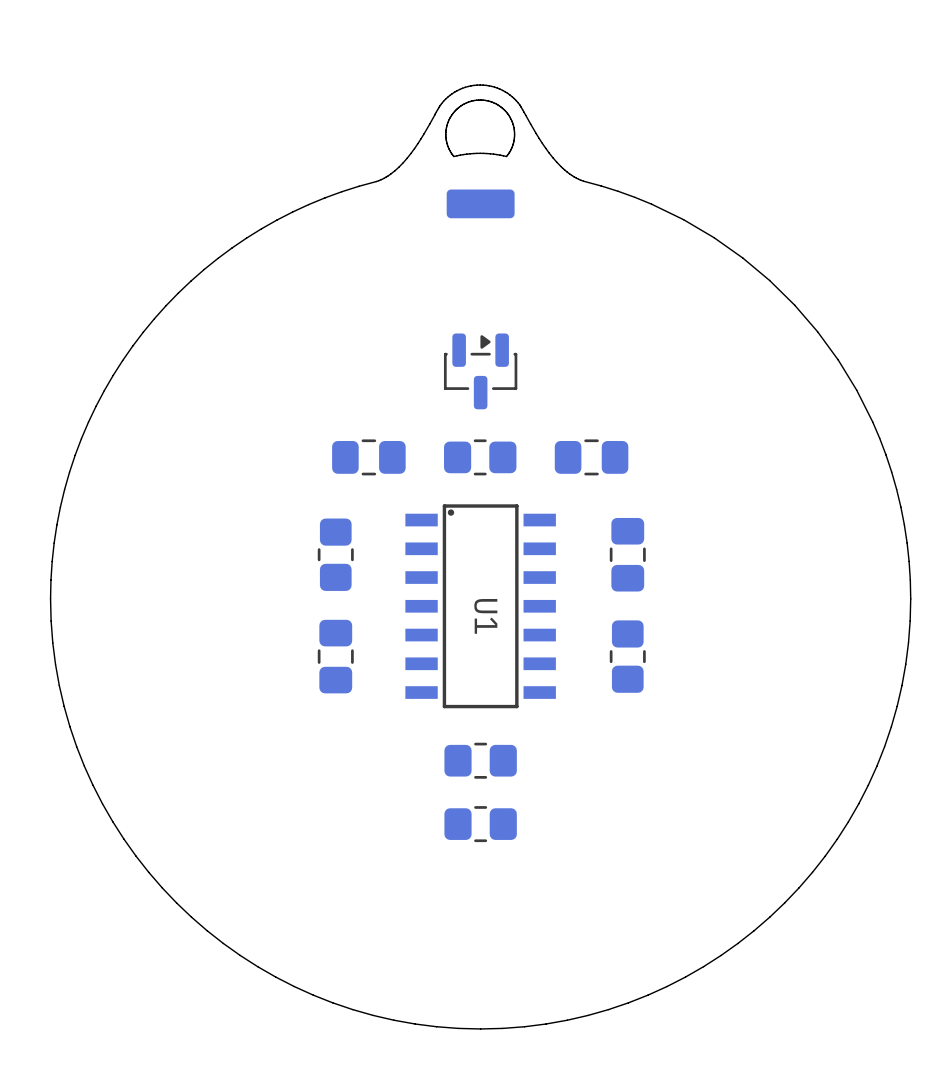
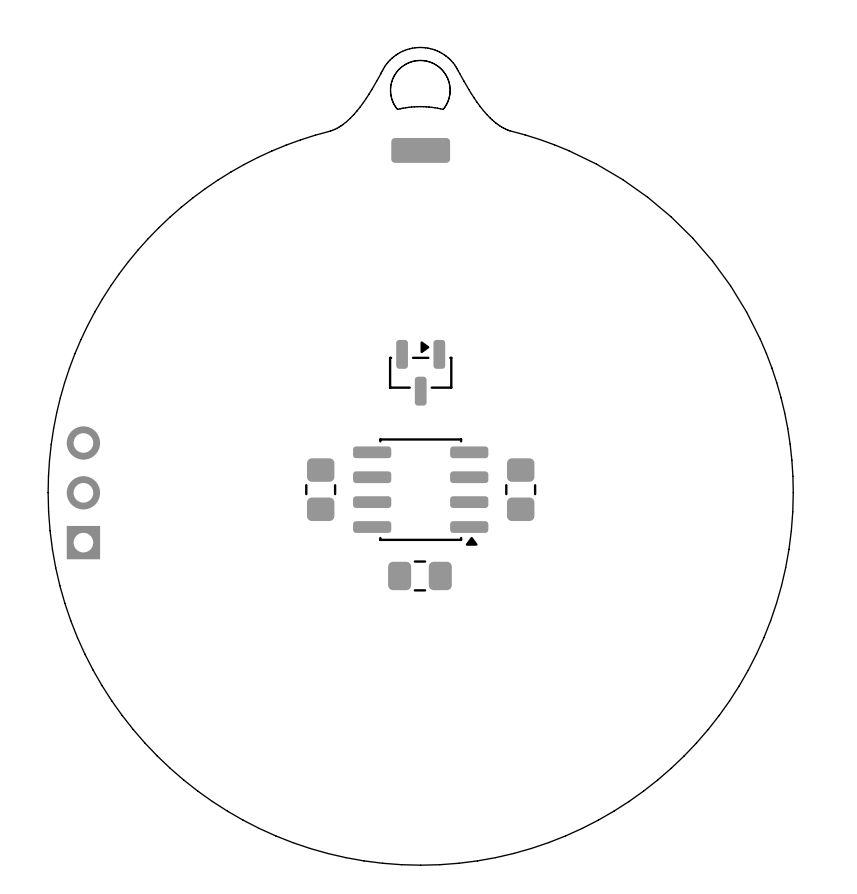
part: (480, 371) -> none
part footprint: [444, 439, 517, 476] -> [388, 339, 453, 406]
part: (368, 457) -> none
part: (591, 457) -> none
part position: (335, 554) -> (320, 489)
part: (627, 554) -> none
part: none -> (420, 492)
part: none -> (83, 492)
U1: (480, 606) -> none
part: (335, 656) -> none
part position: (627, 656) -> (520, 489)
part: none -> (419, 575)
part: (480, 760) -> none
part: (480, 824) -> none

